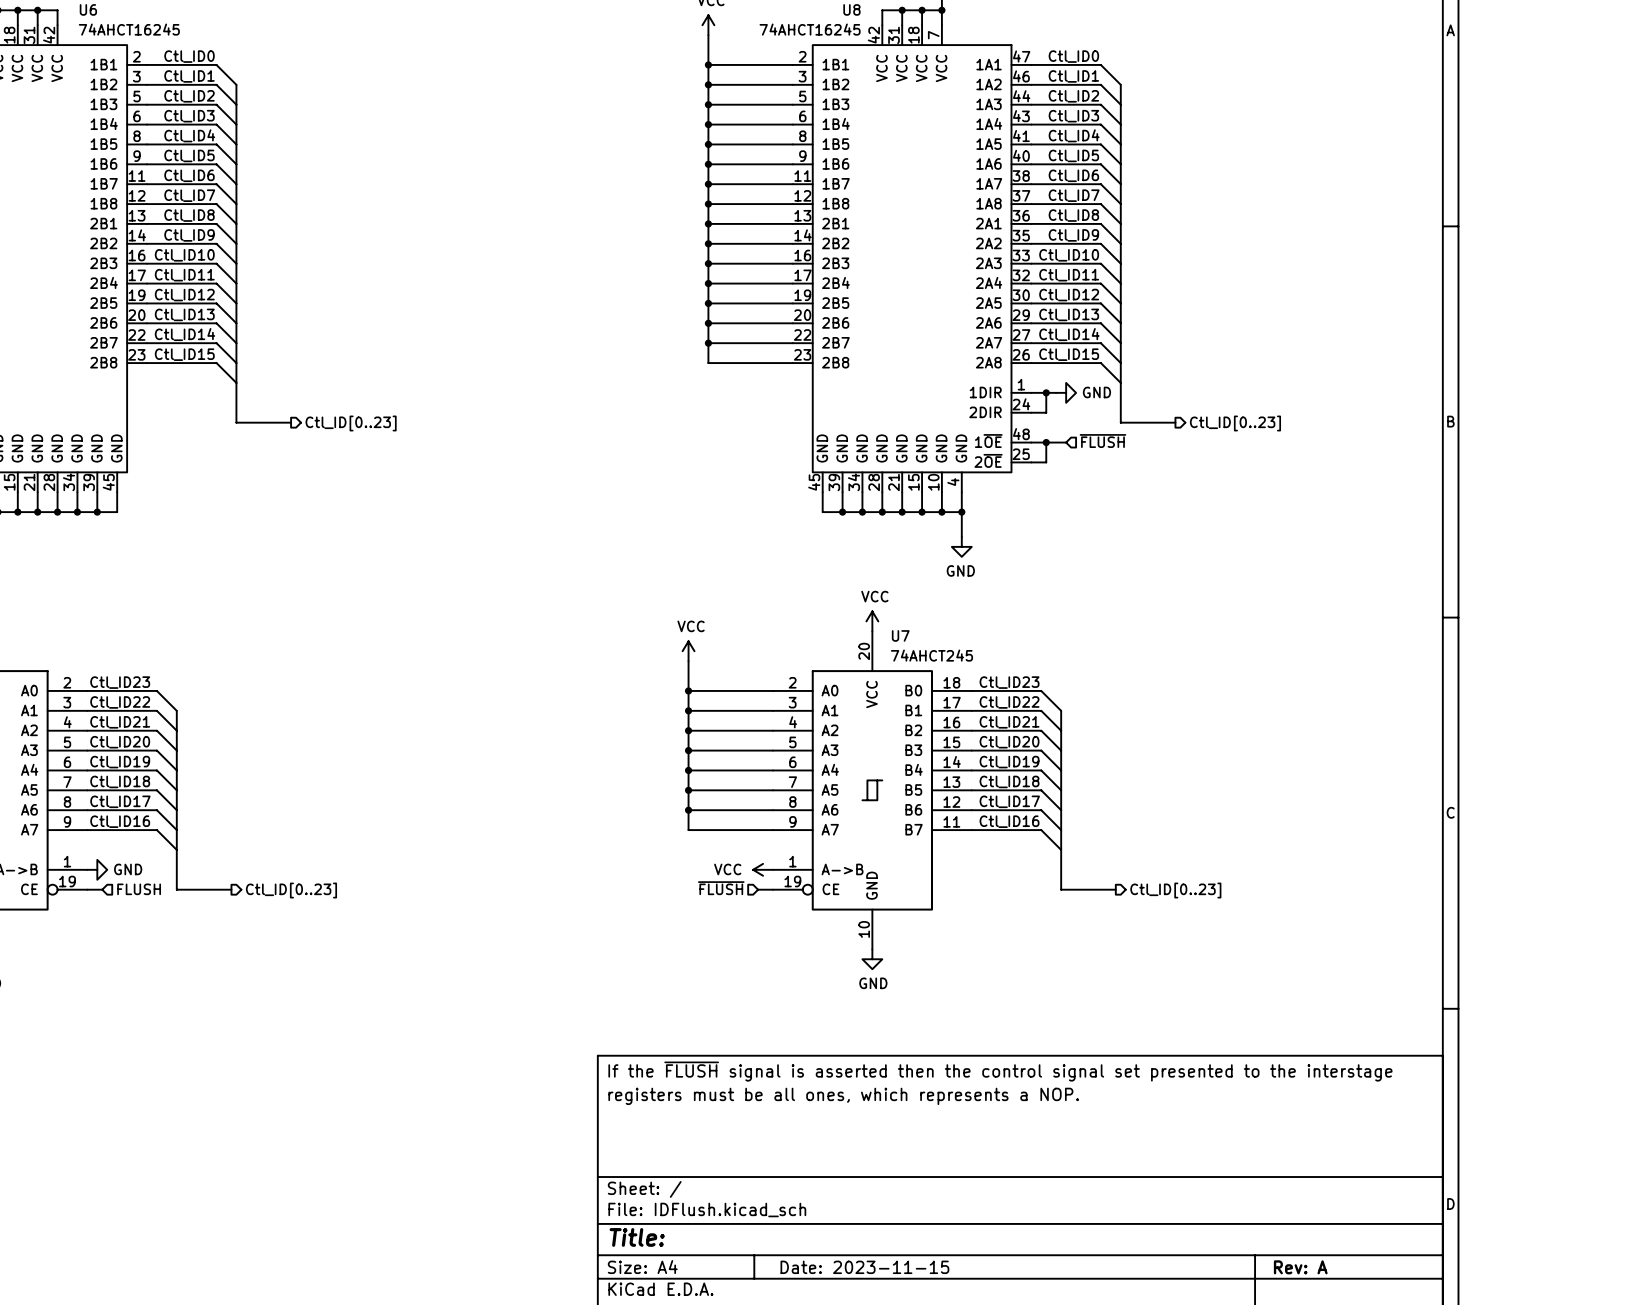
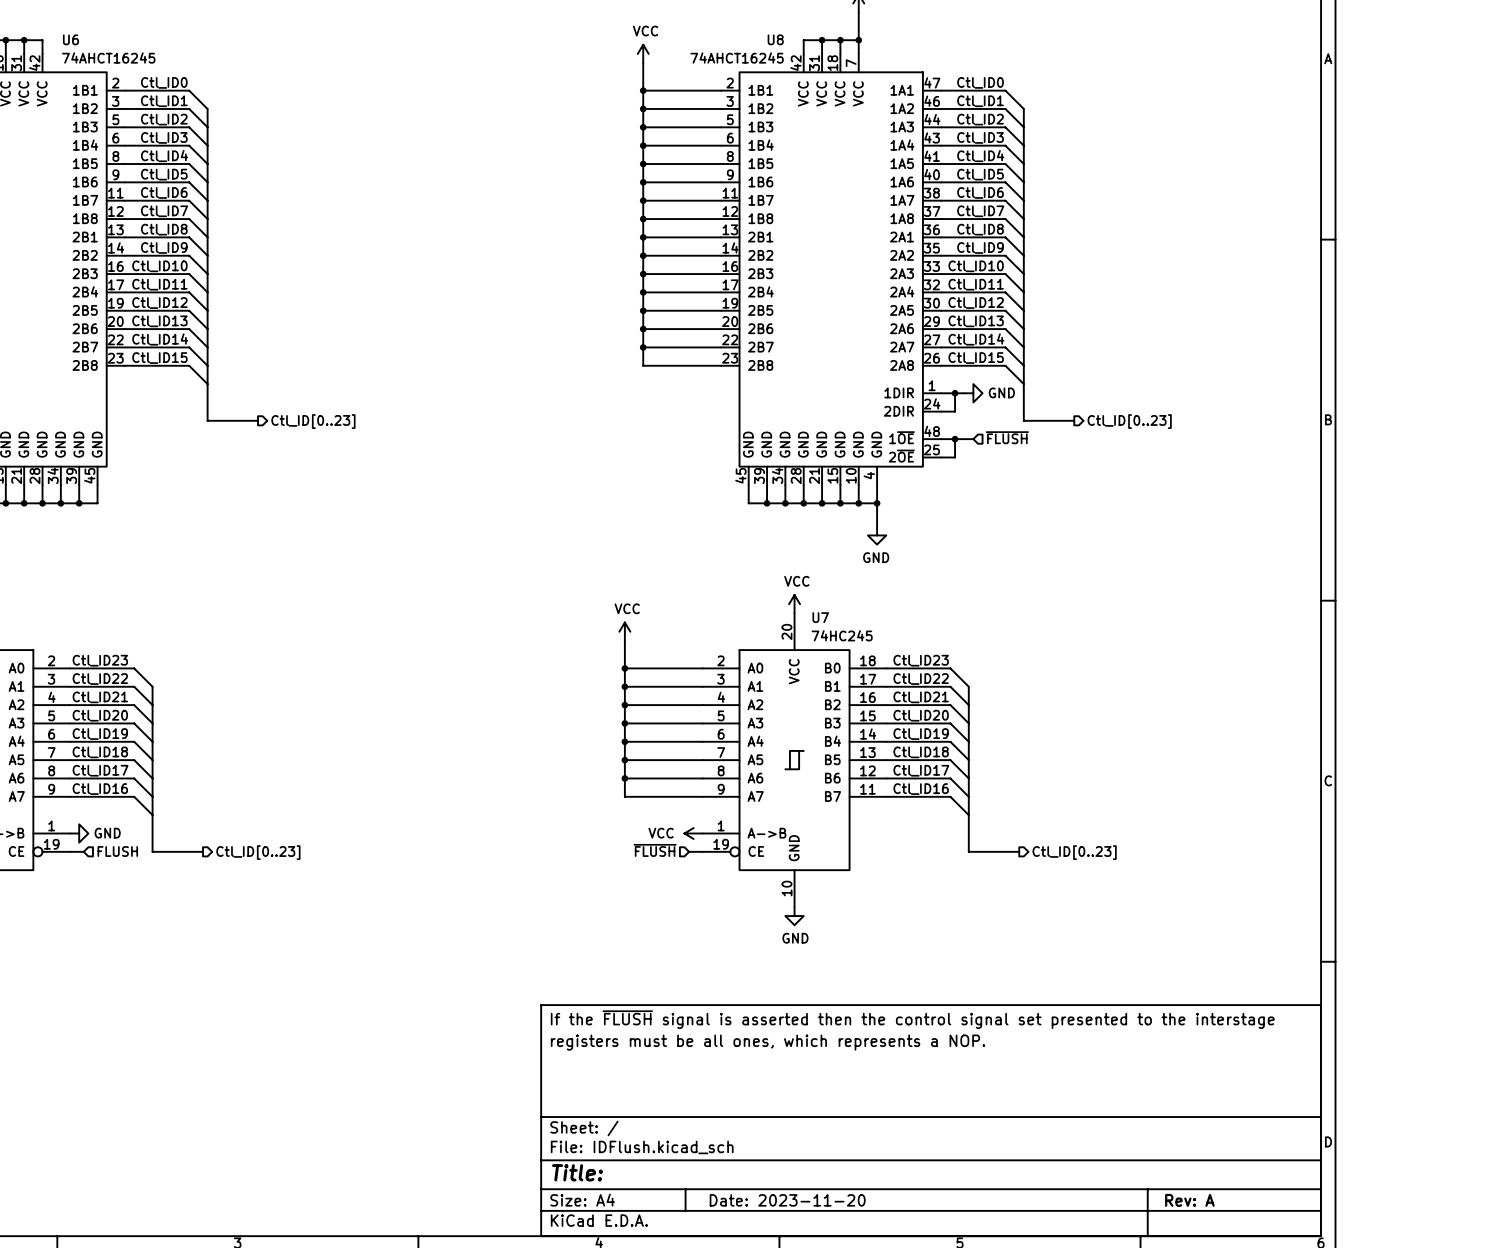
U7 value: 74AHCT245 (931, 655) -> 74HC245 (842, 635)
title block: Date: 2023-11-15 (864, 1267) -> Date: 2023-11-20 (787, 1200)

